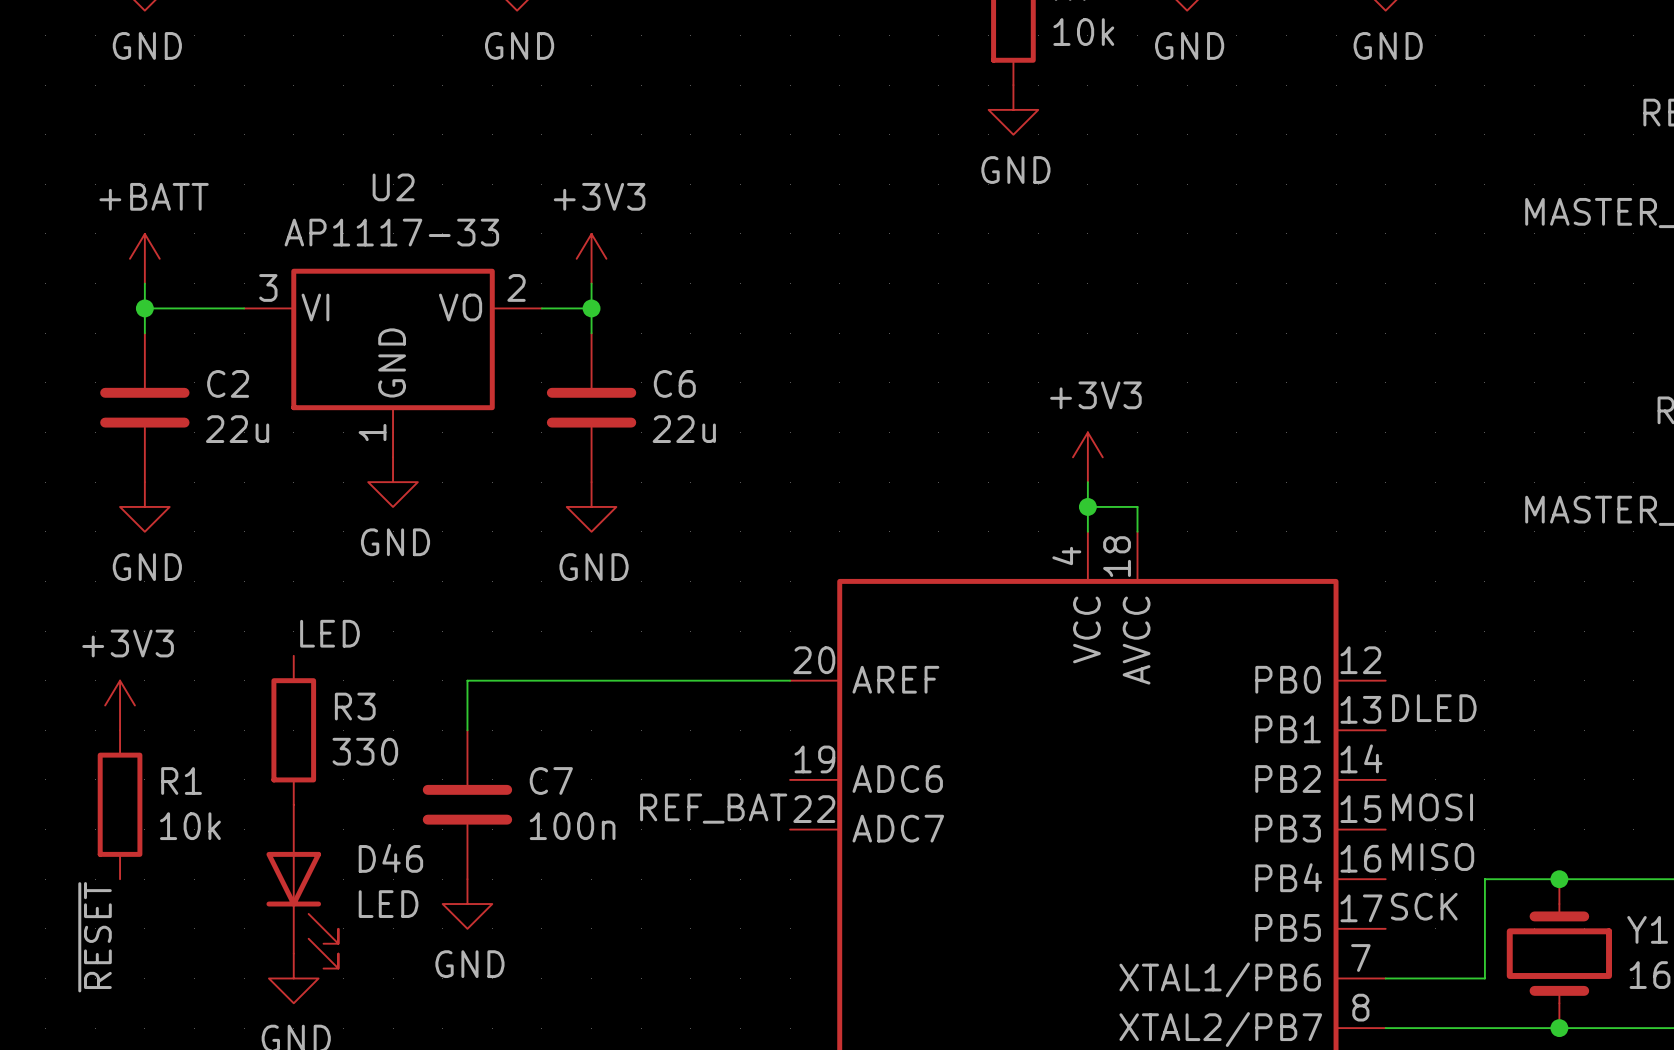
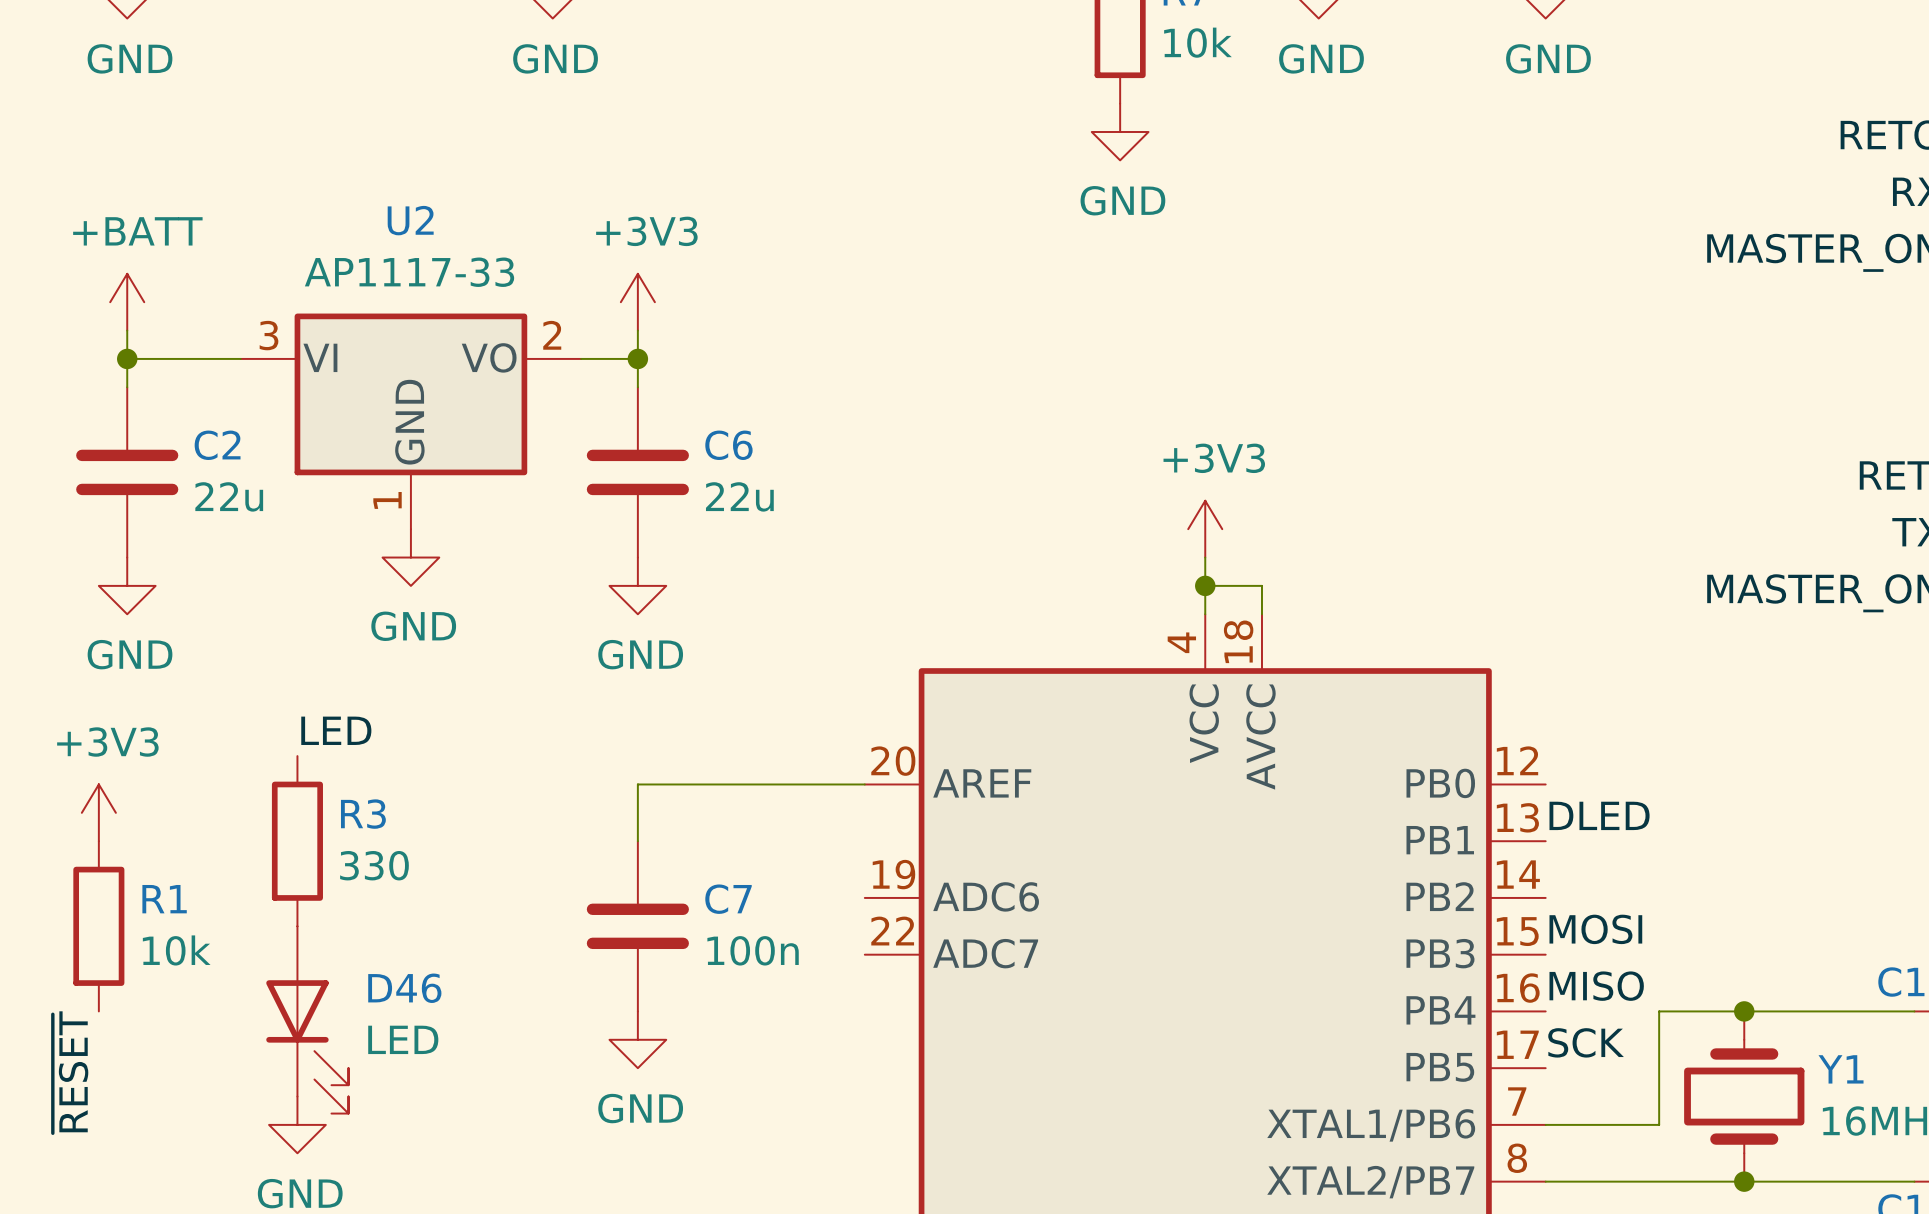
wire: (591, 680) (467, 680) (467, 730) -> (637, 784) (637, 841)
C7 position: (467, 804) -> (637, 926)
label: REF_BAT (713, 808) -> none
power symbol position: GND (467, 904) -> GND (637, 1039)

